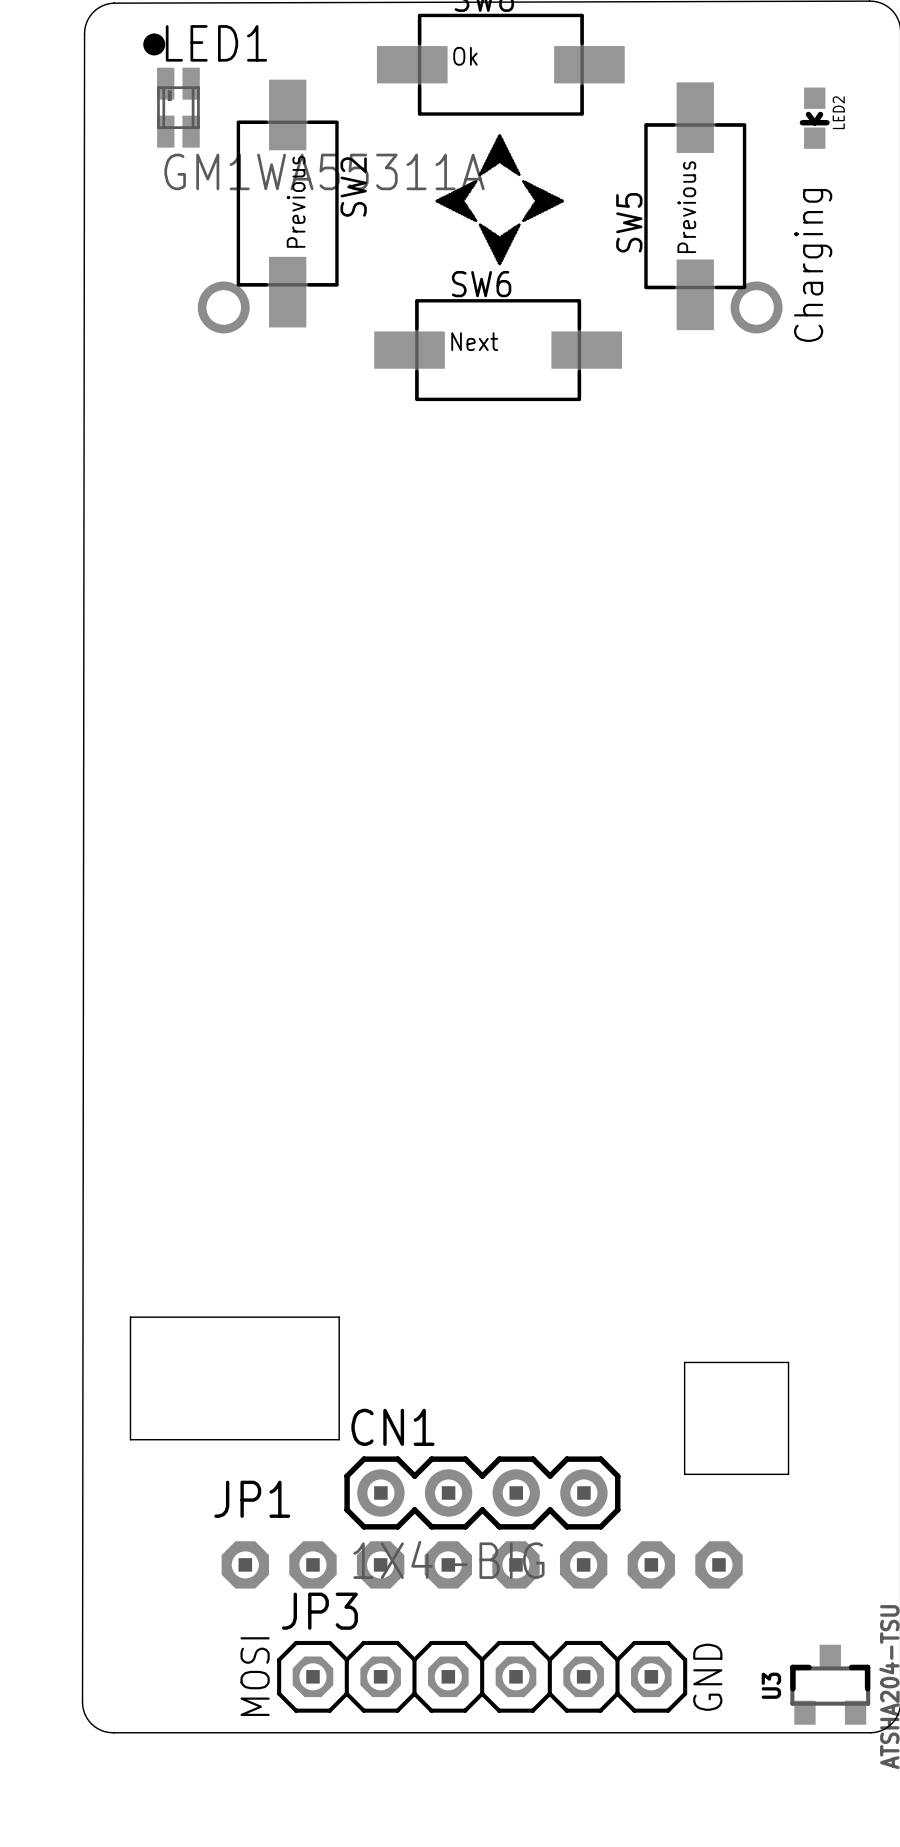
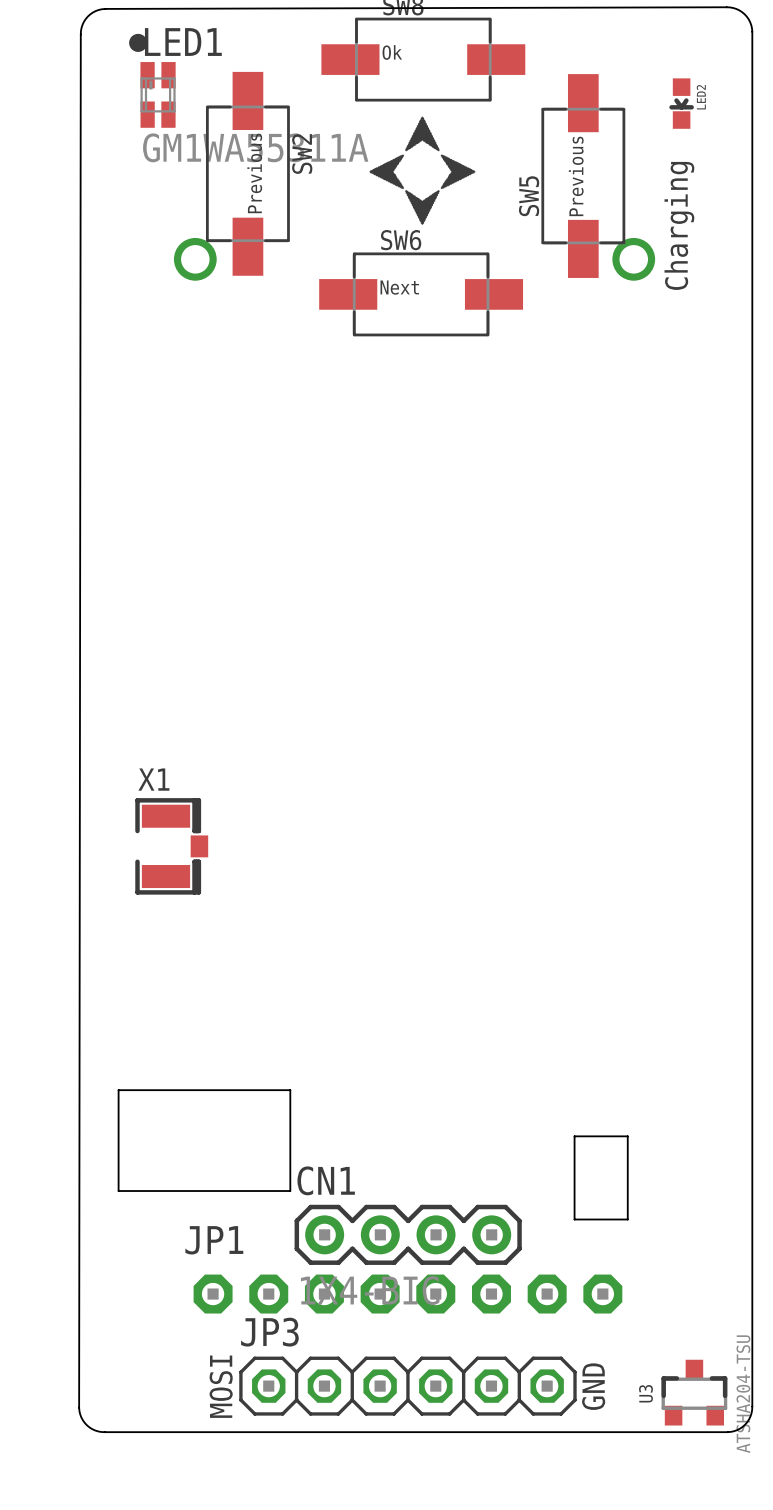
X1: none -> (171, 846)
board edge: (684, 1373) (684, 1362) (788, 1362) (788, 1474) (749, 1474) -> (574, 1136) (627, 1136) (627, 1219)

